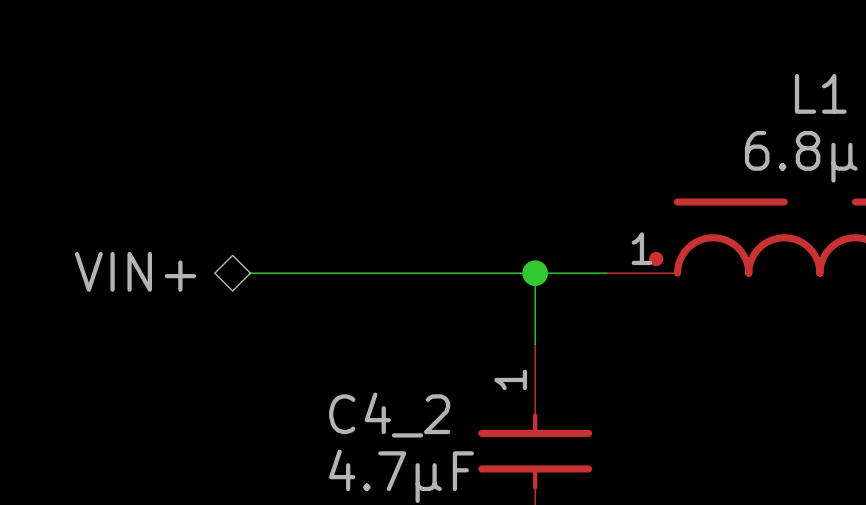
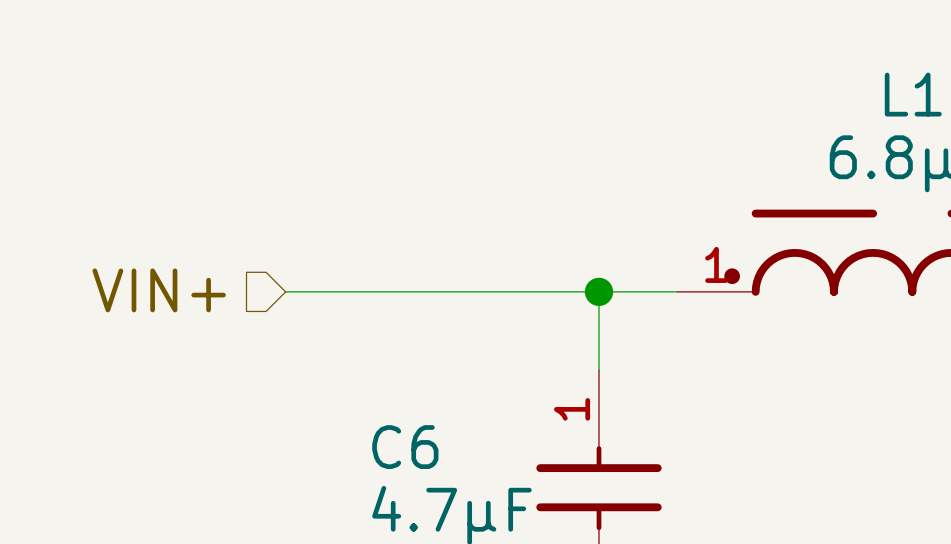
hierarchical label shape: bidirectional (135, 271) -> input (159, 290)
C4_2 name: C4_2 (389, 415) -> C6 (405, 447)

